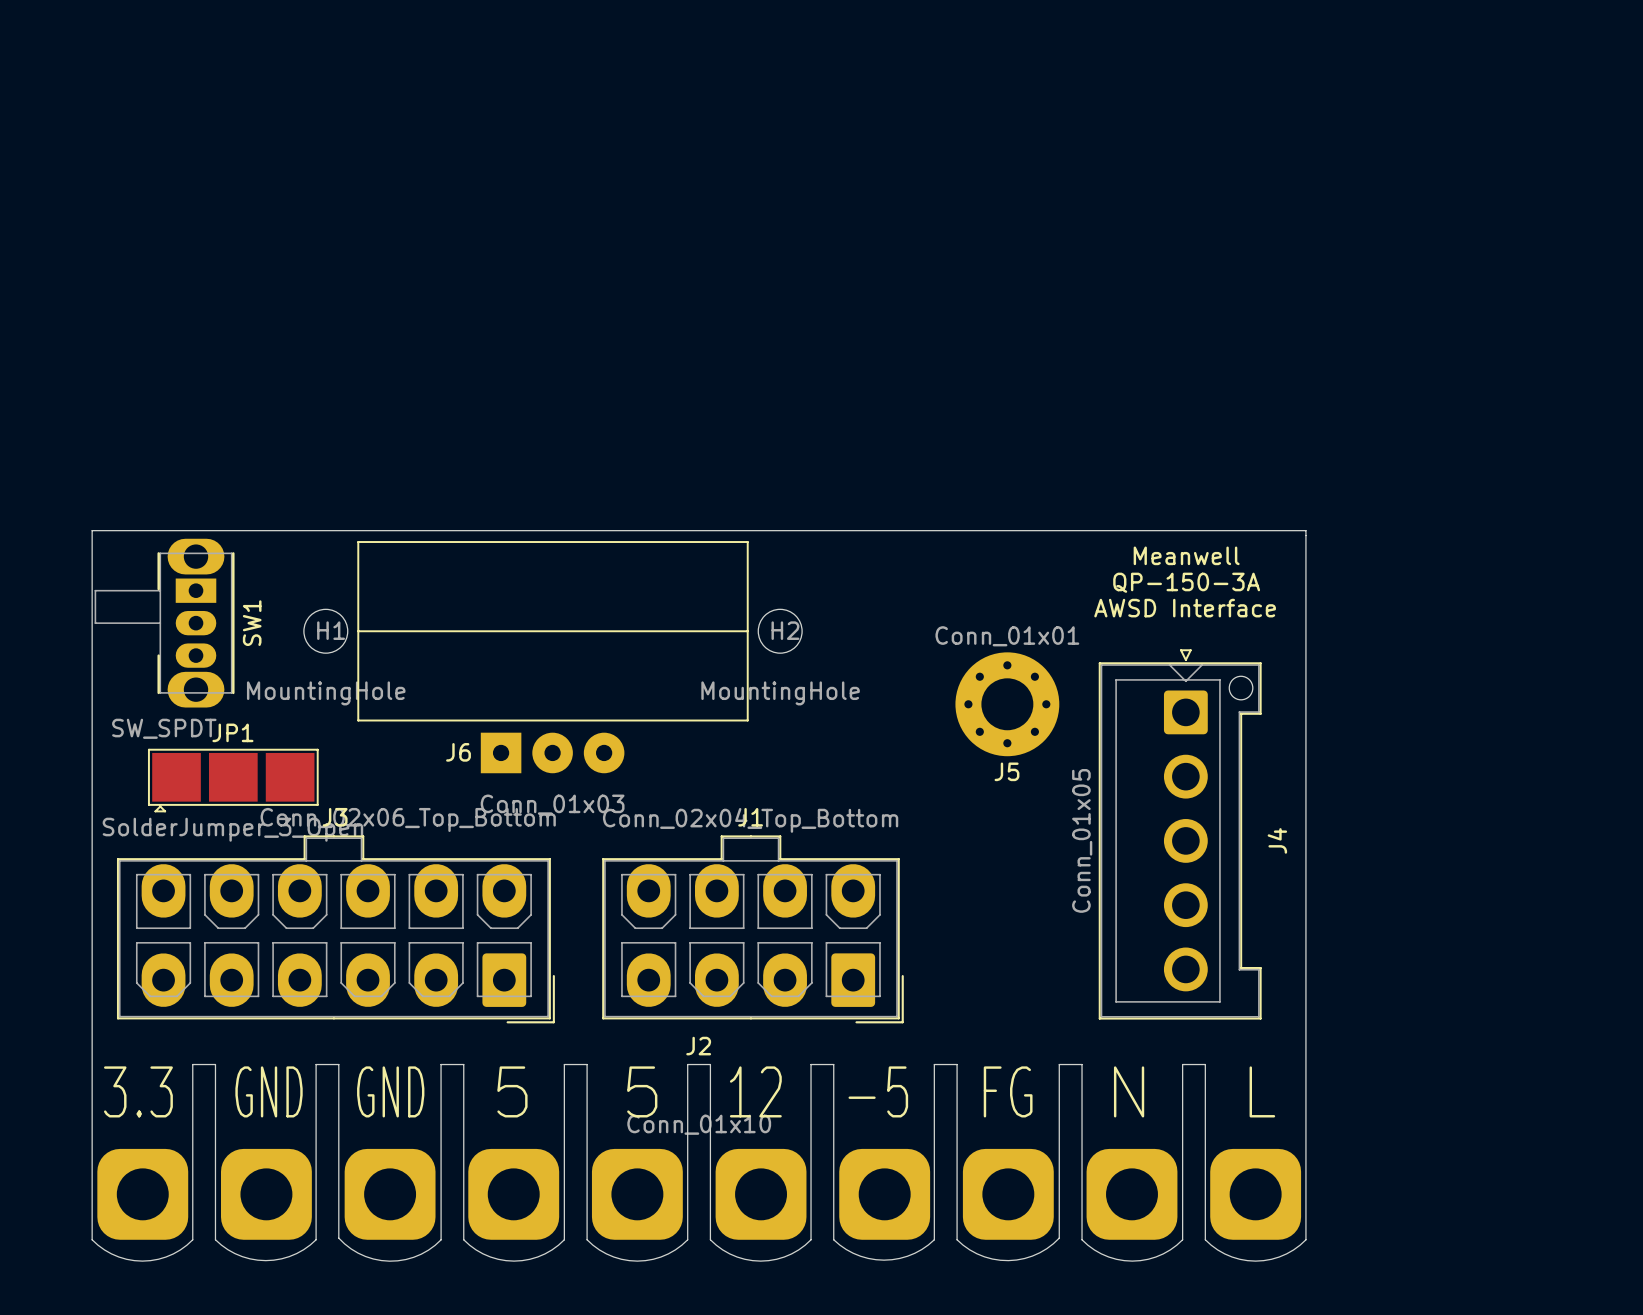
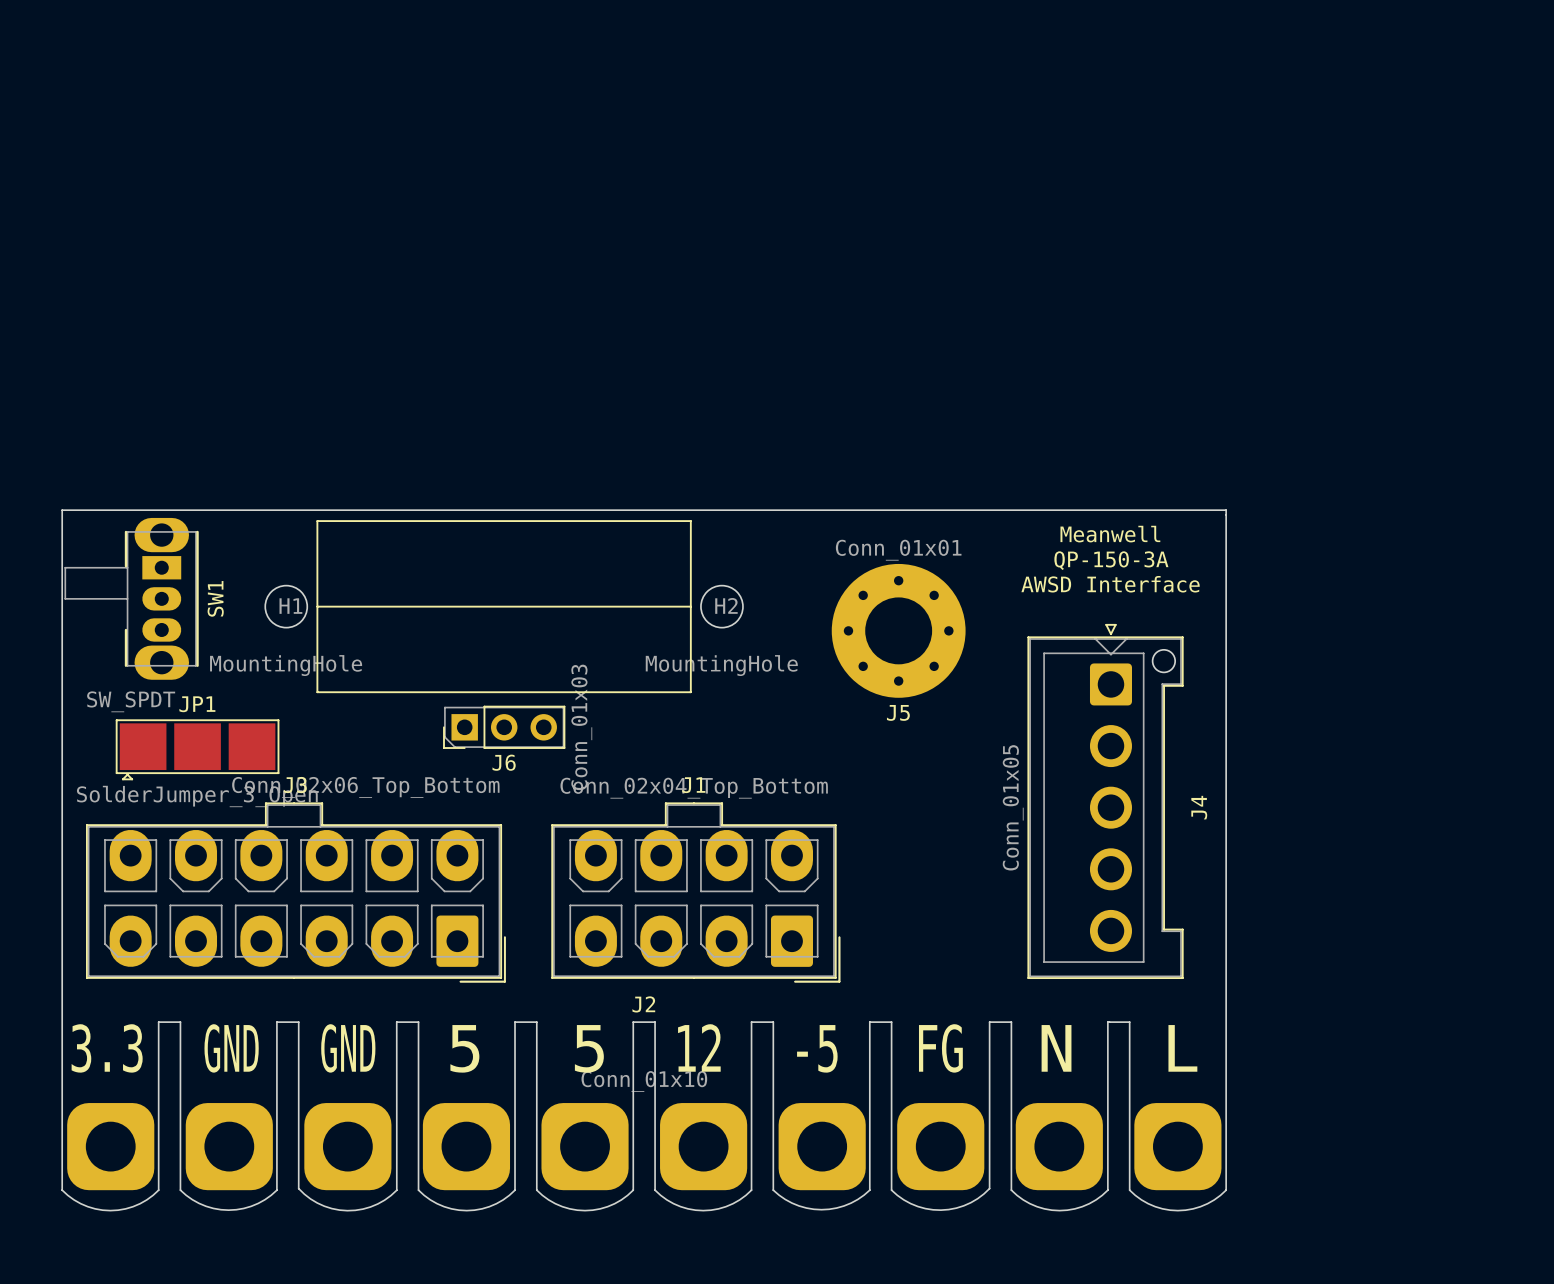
J5 footprint: [955, 652, 1060, 757] -> [831, 563, 966, 698]
J6 footprint: [480, 732, 625, 774] -> [443, 705, 566, 749]
J6 name position: J6 (458, 752) -> J6 (504, 762)
J6 value position: Conn_01x03 (552, 804) -> Conn_01x03 (581, 727)

